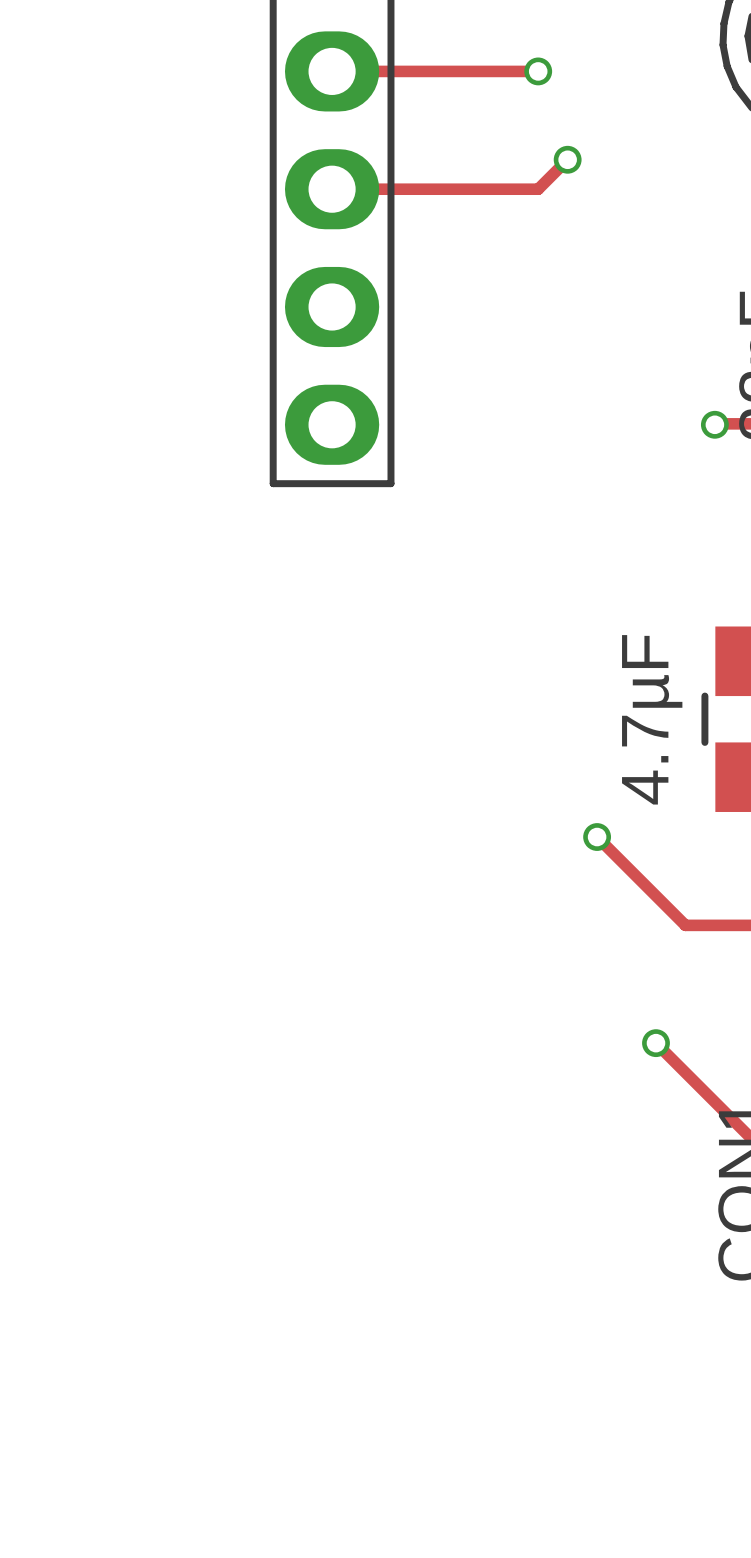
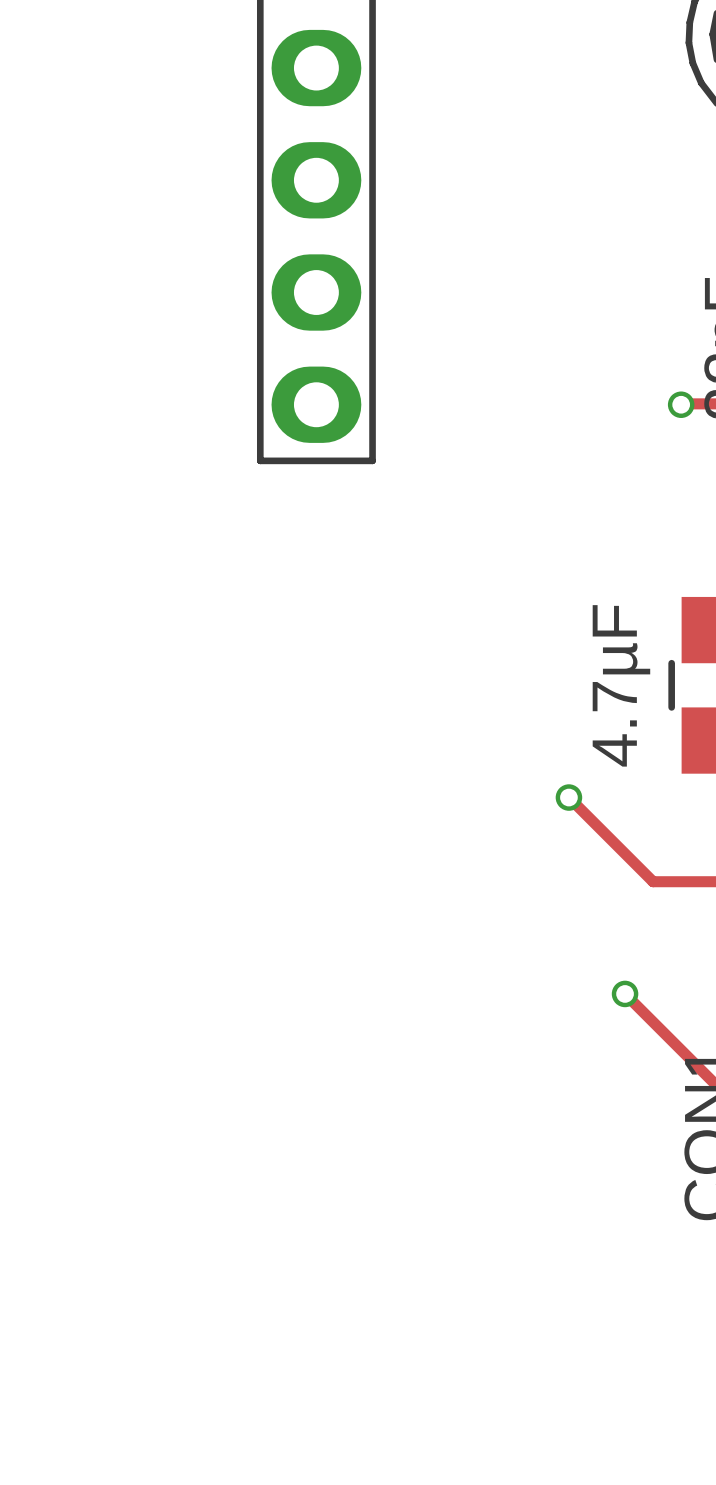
track: (332, 71) (538, 71) -> none
via: (538, 71) -> none
track: (567, 159) (538, 189) (332, 189) -> none
via: (567, 159) -> none

